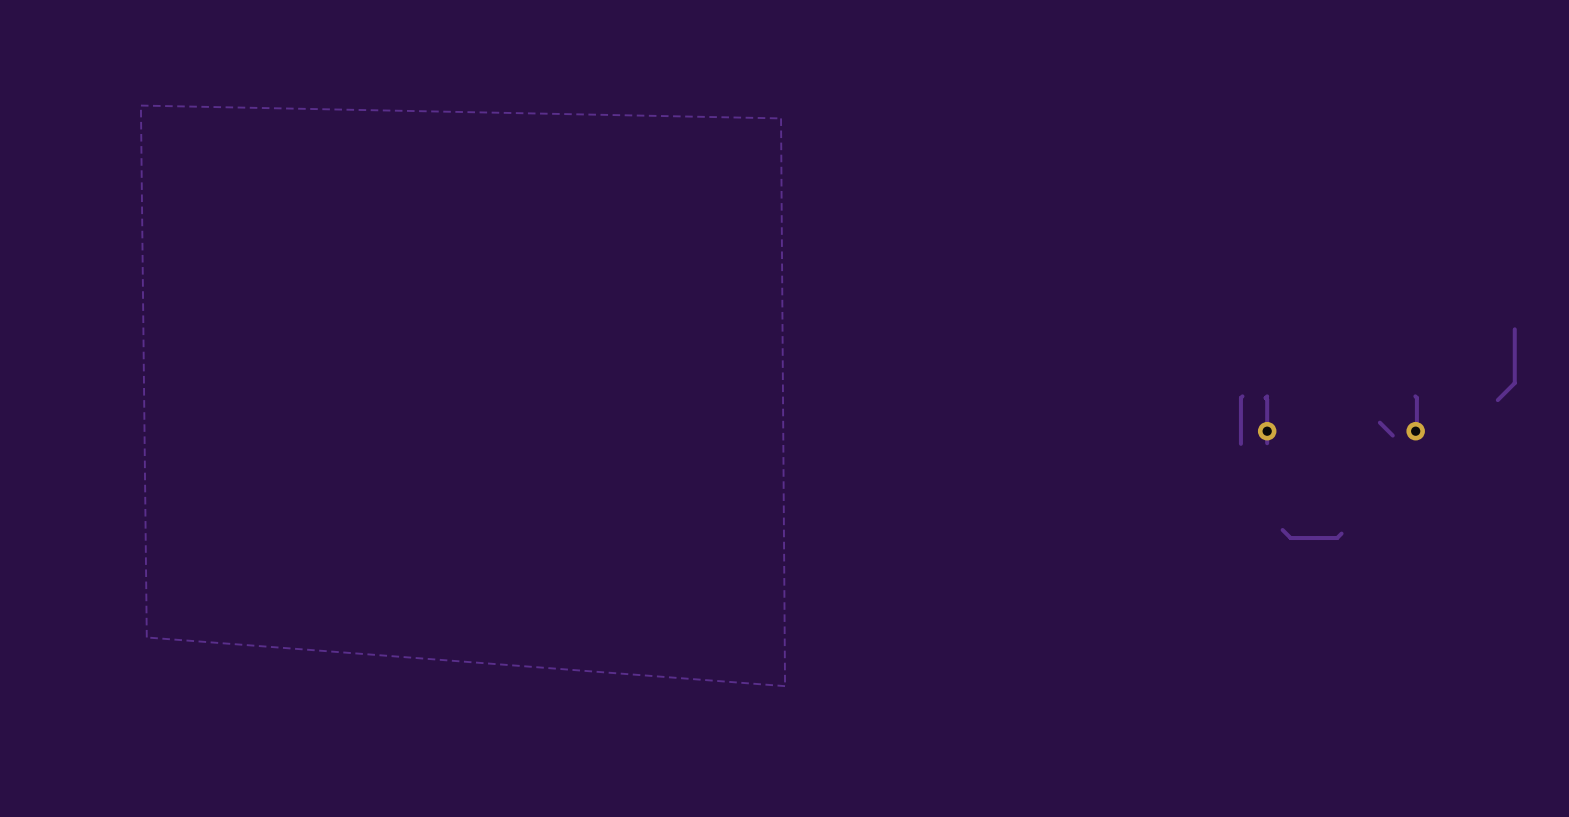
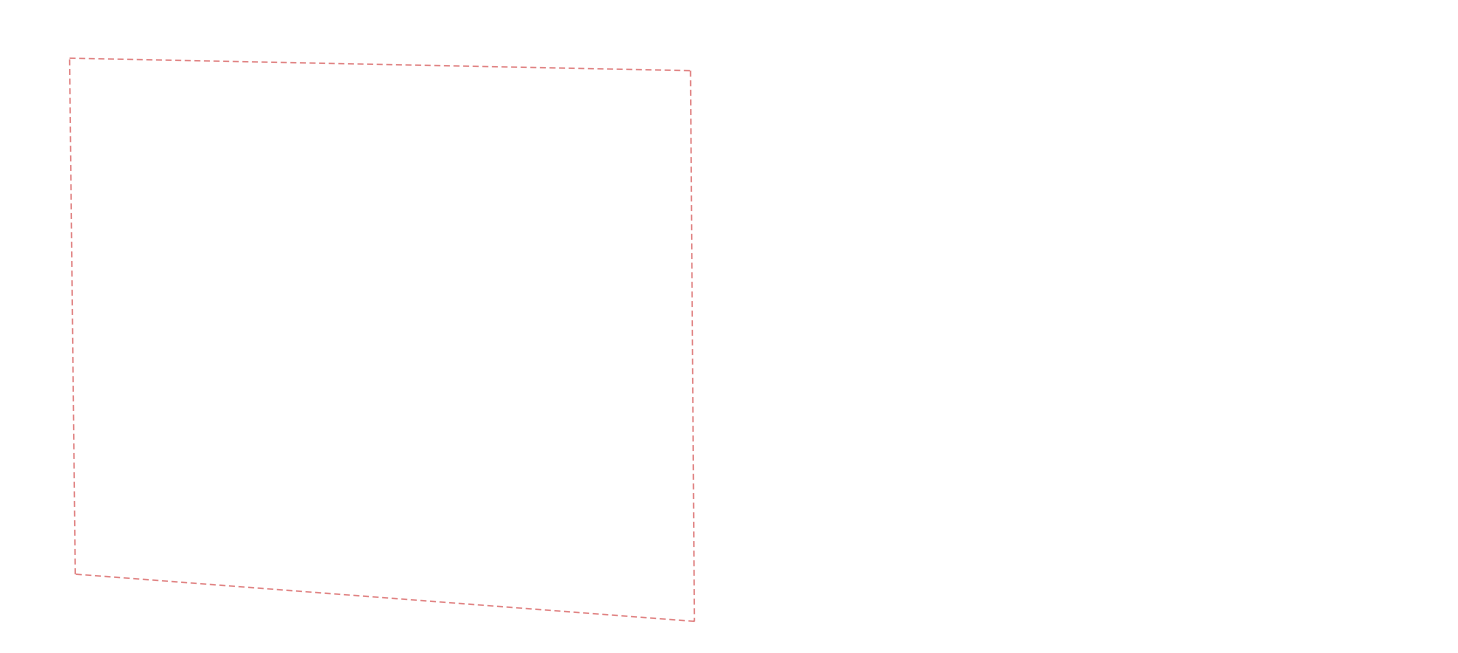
track: (1514, 329) (1514, 383) (1497, 400) -> none
track: (1242, 396) (1240, 443) -> none
track: (1267, 396) (1265, 397) (1267, 443) -> none
track: (1415, 396) (1416, 397) (1415, 431) -> none
track: (1379, 422) (1392, 435) -> none
via: (1267, 431) -> none
via: (1415, 431) -> none
track: (1282, 529) (1290, 538) (1337, 538) (1341, 533) -> none

